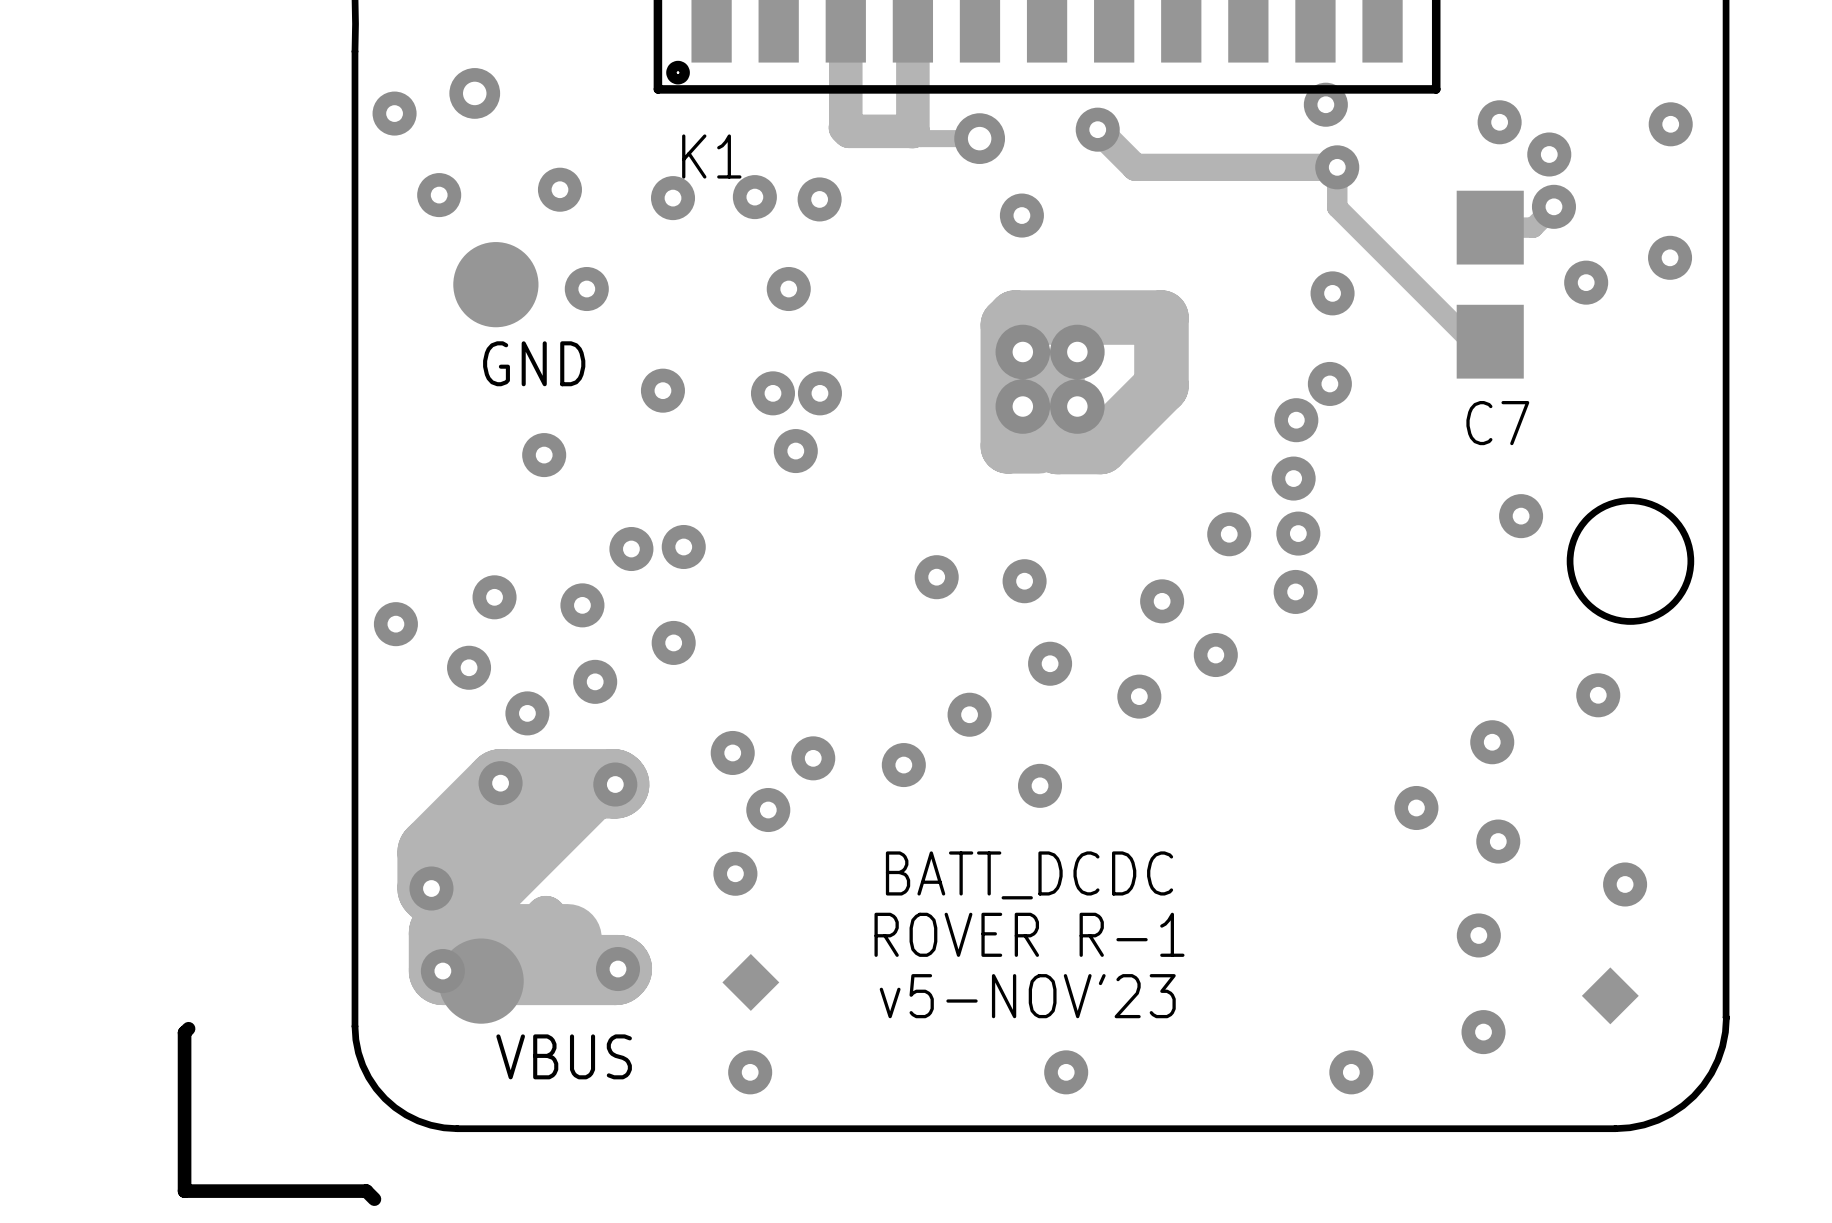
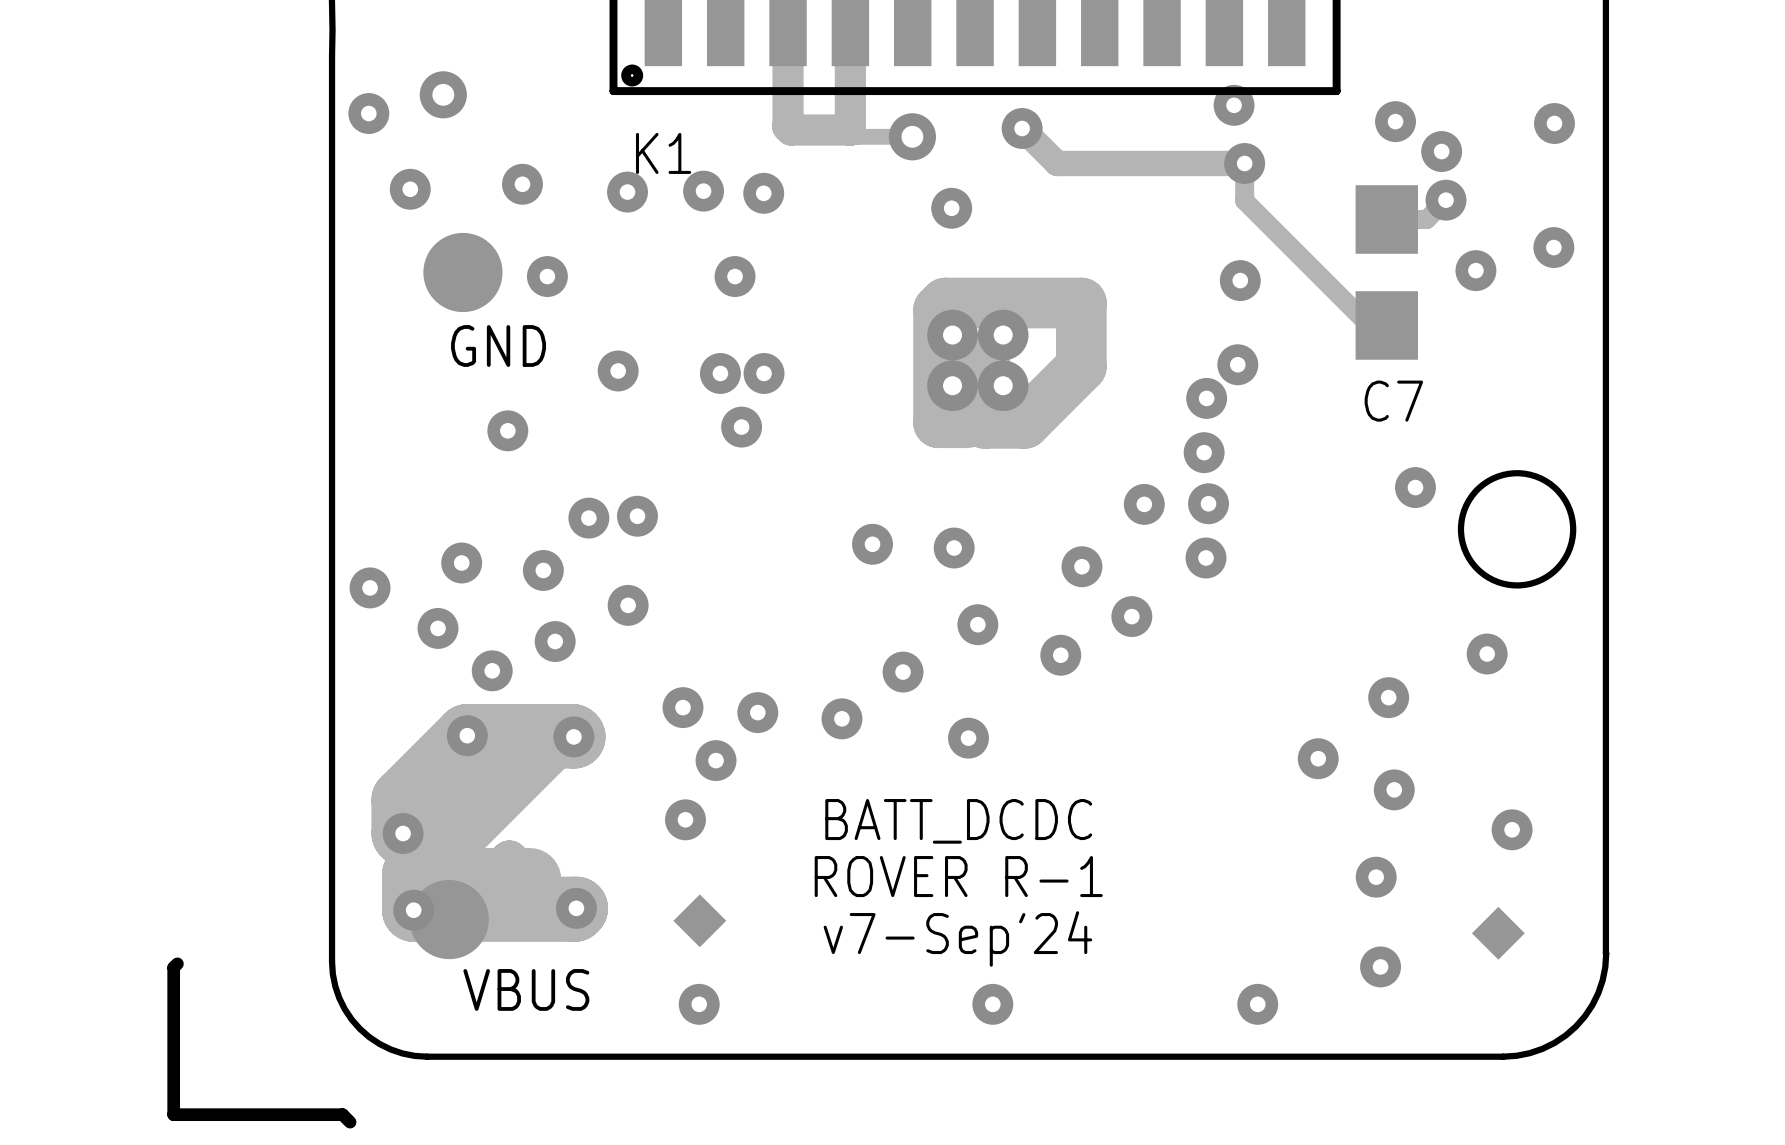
text: v5-NOV'23 (1027, 996) -> v7-Sep'24 (957, 938)

